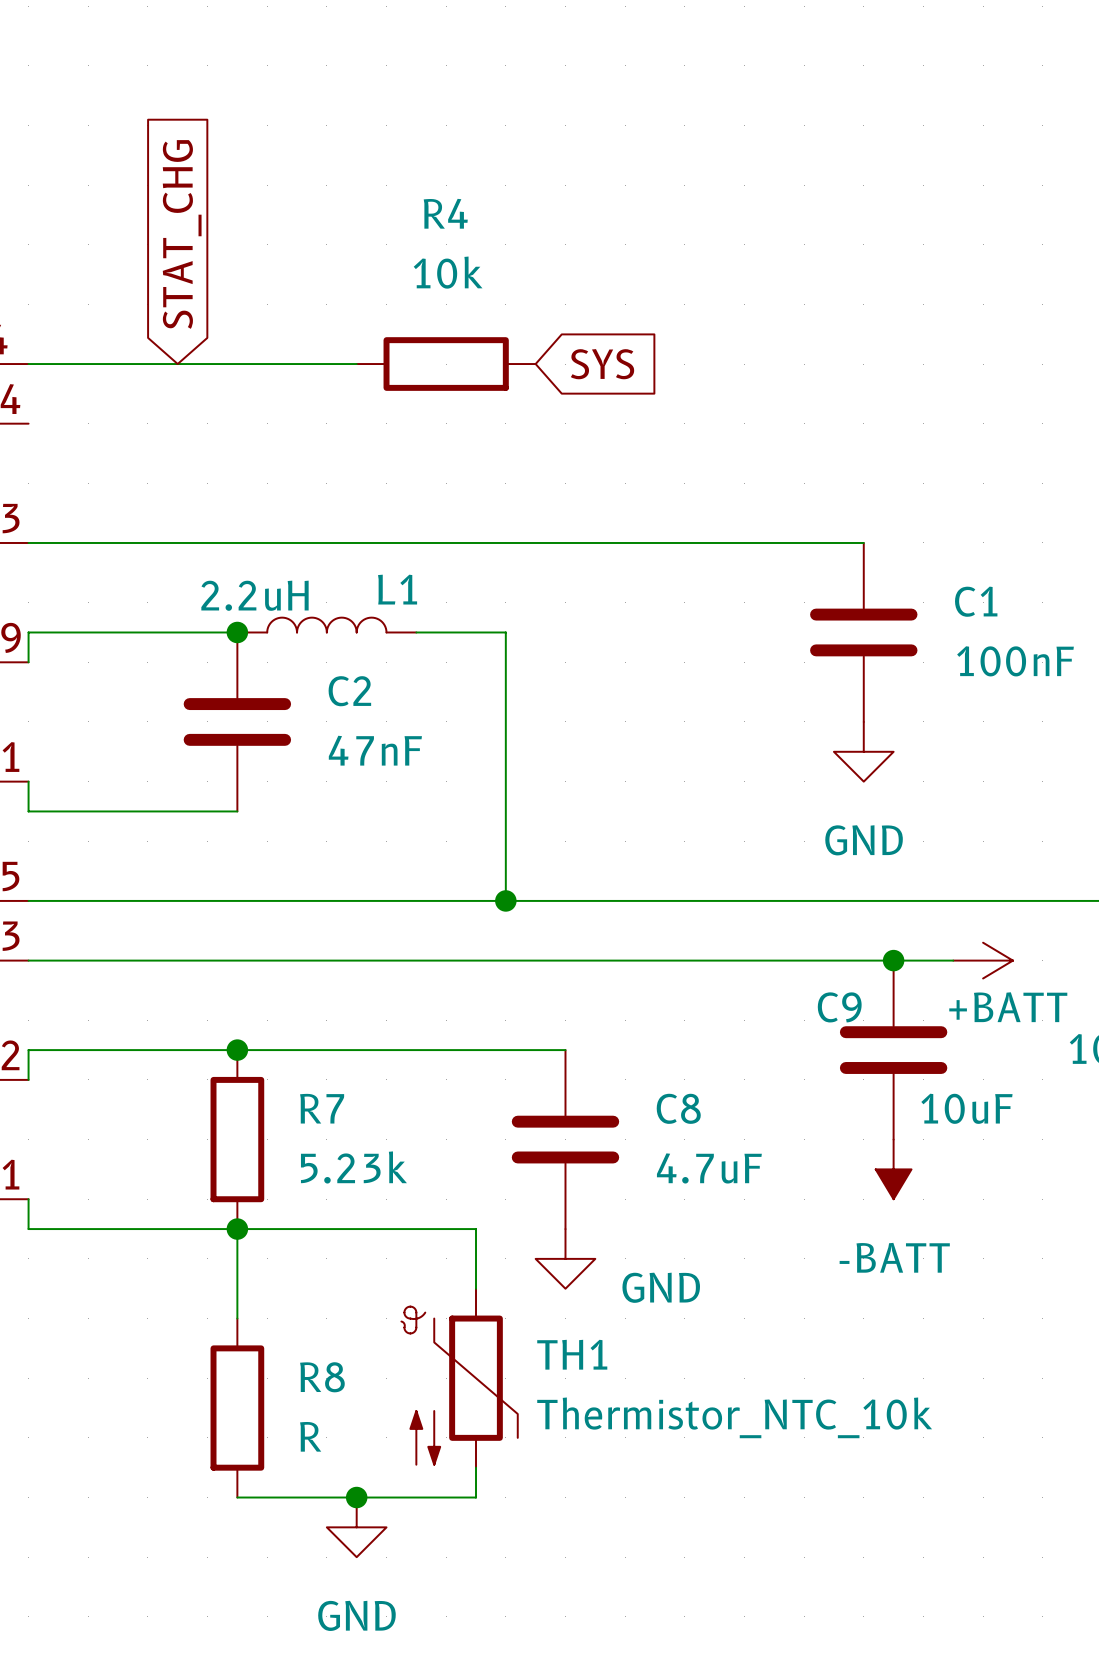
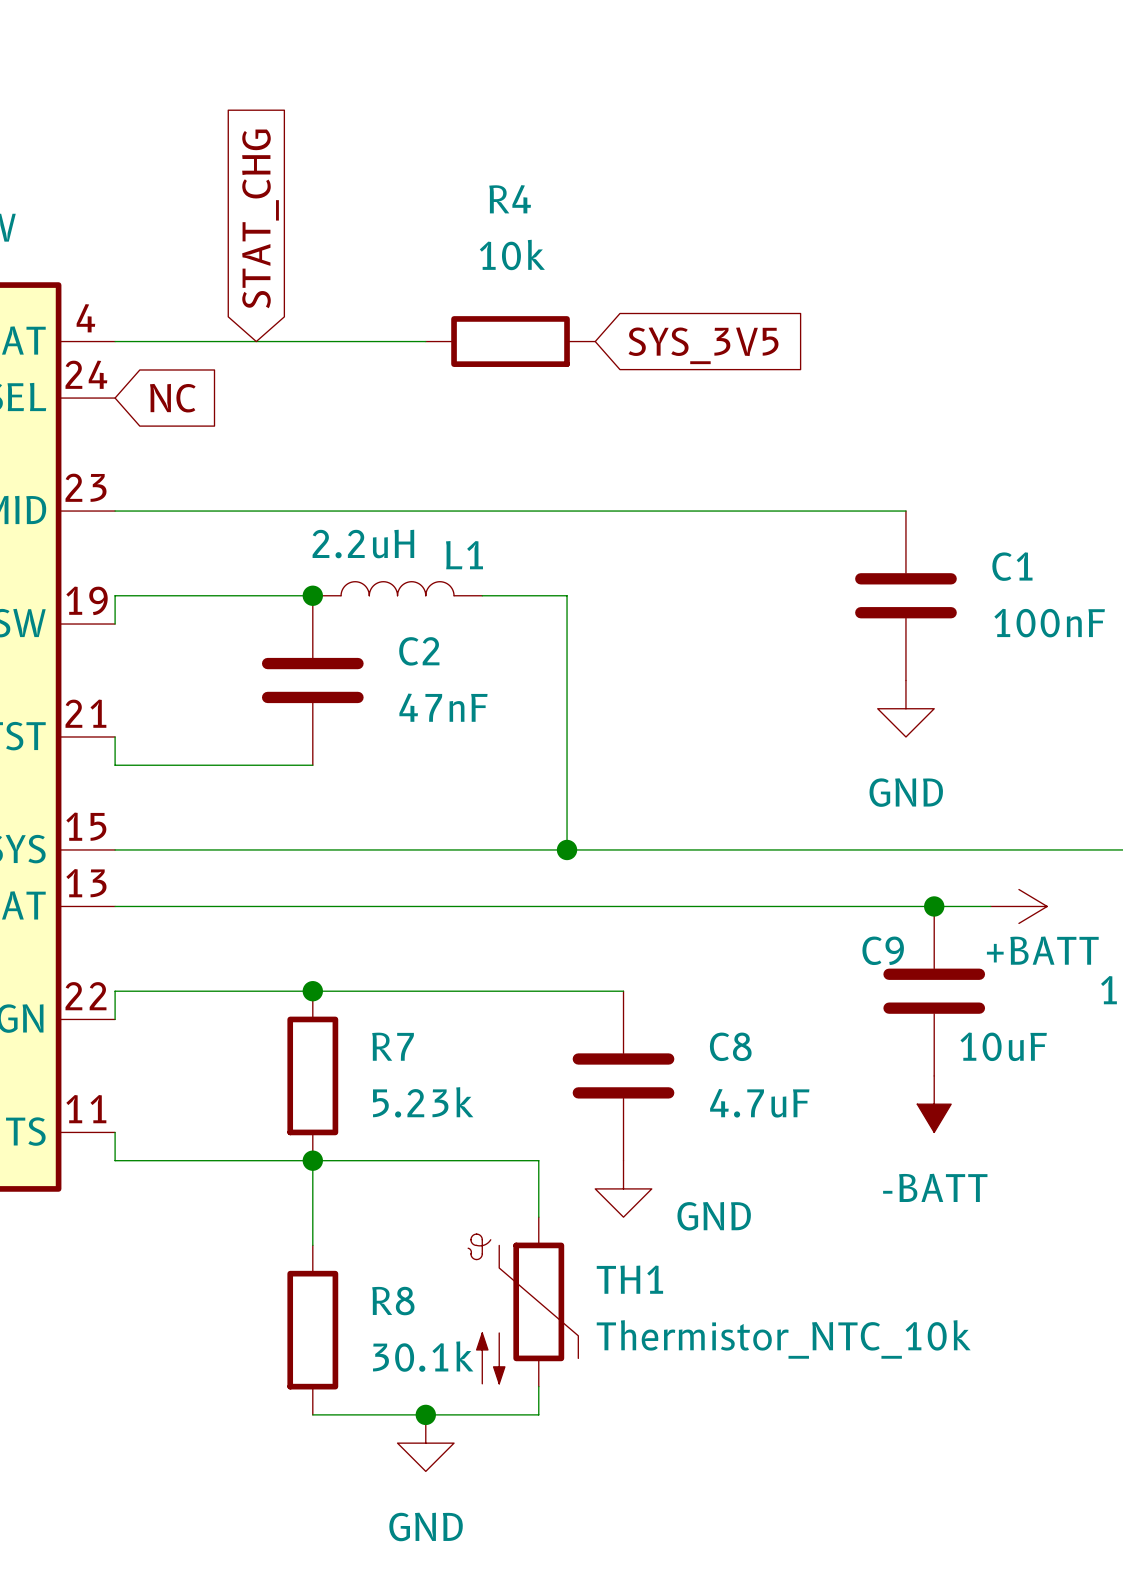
global label: SYS (602, 364) -> SYS_3V5 (703, 345)
global label: none -> NC (172, 398)
L1 value position: 2.2uH (254, 595) -> 2.2uH (363, 544)
R8 value: R (310, 1436) -> 30.1k (423, 1356)

